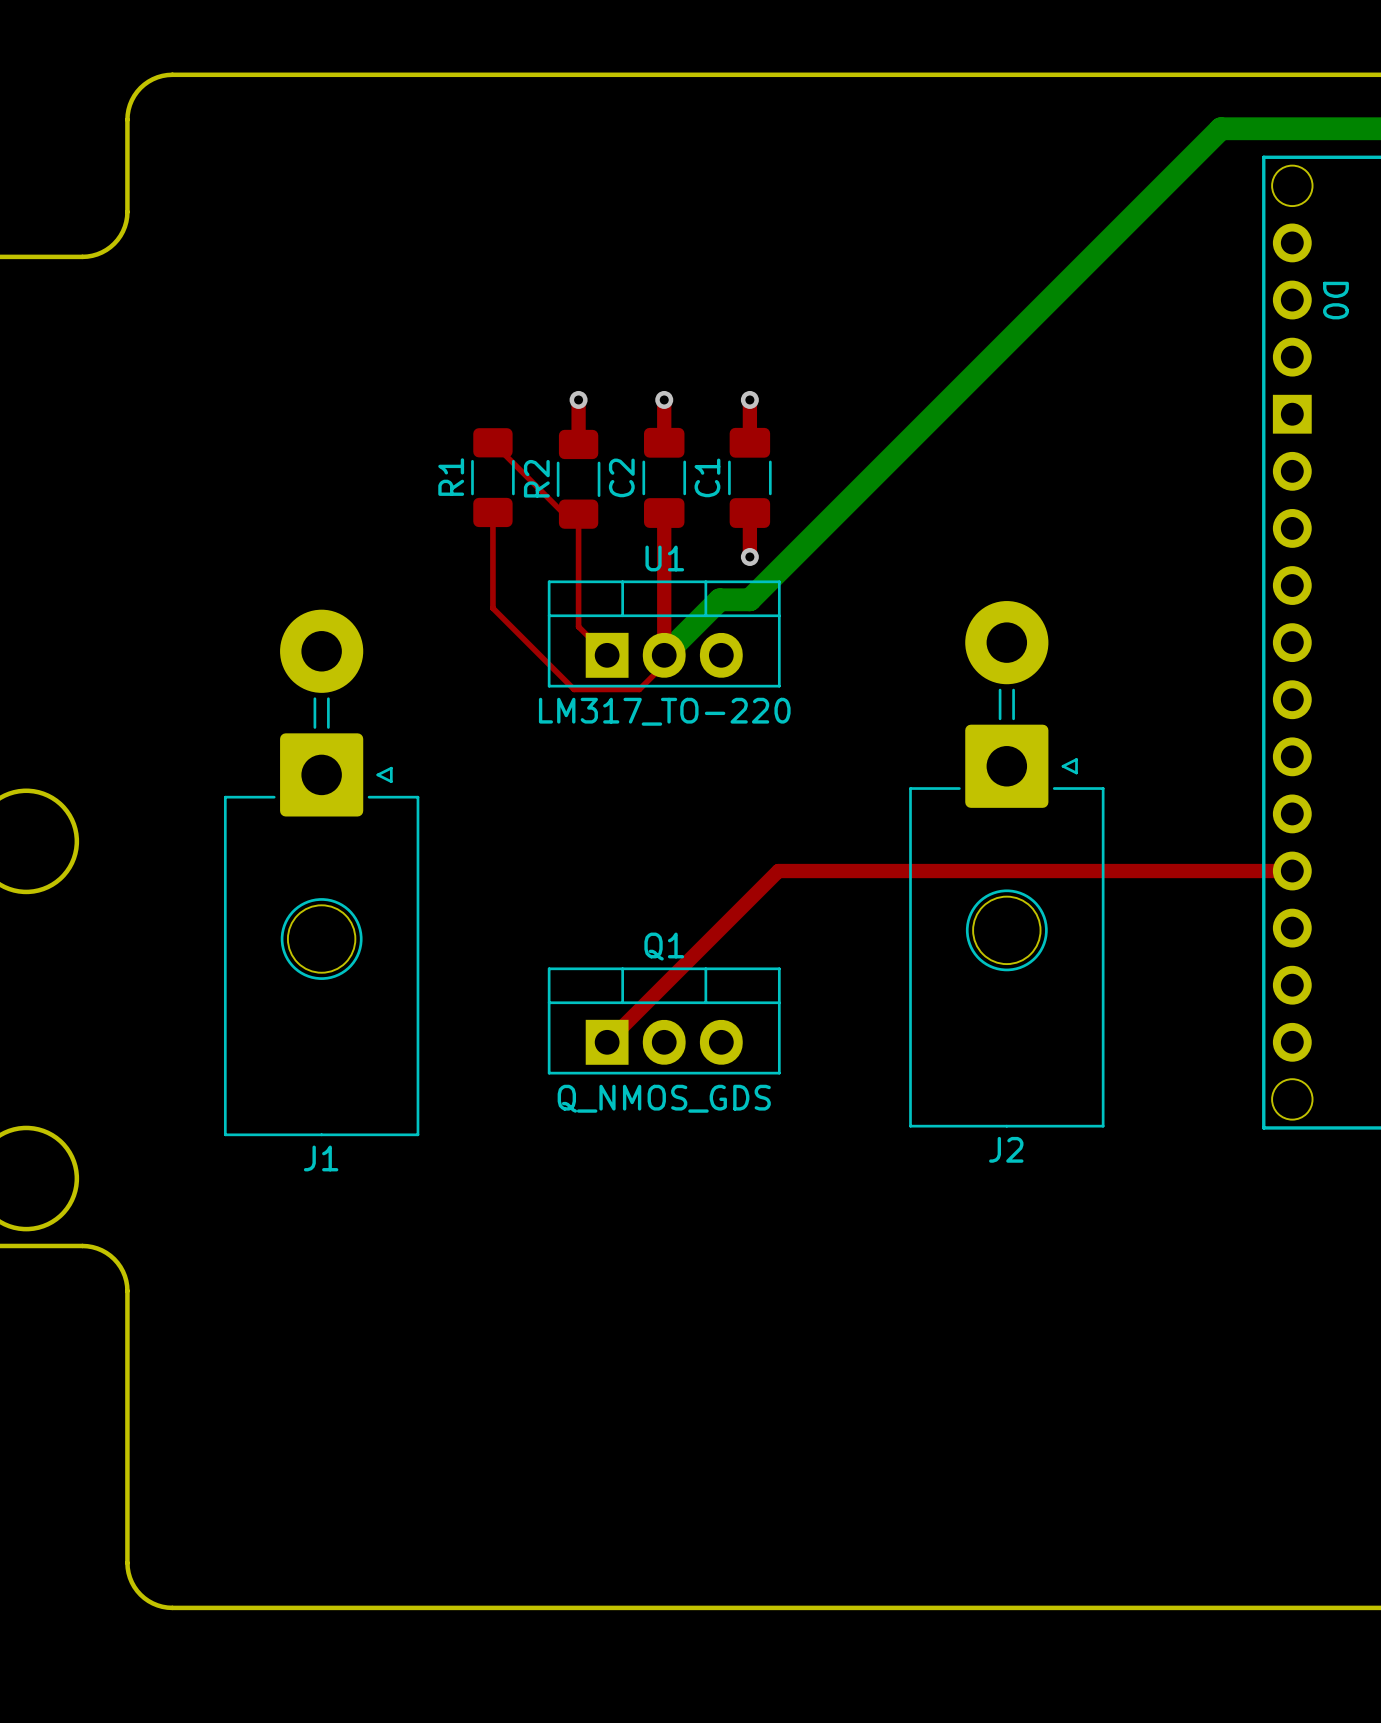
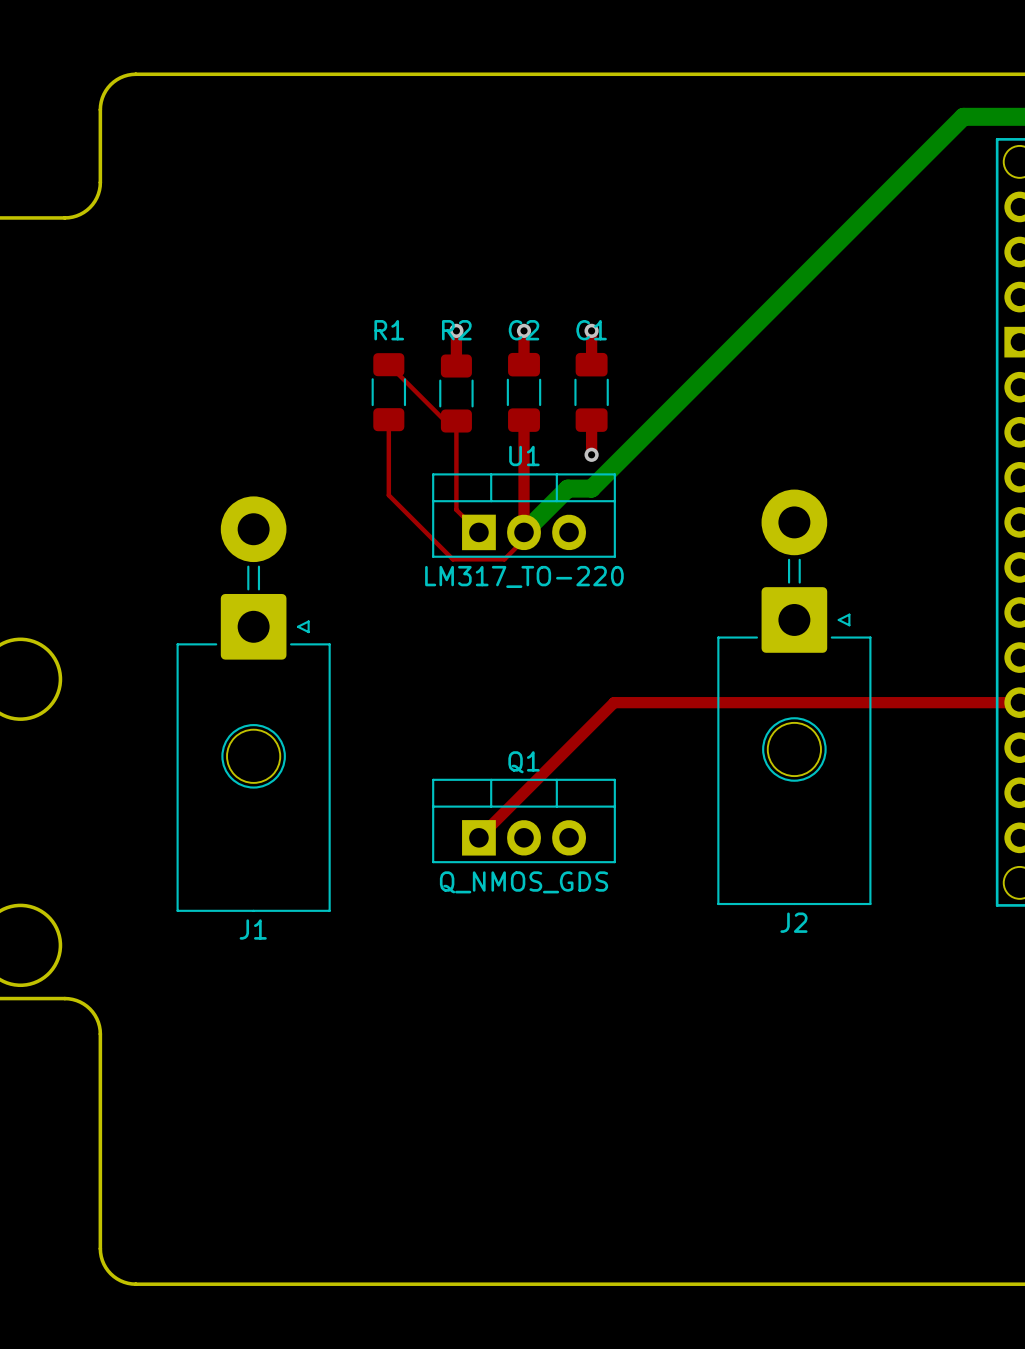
R1 name rotation: 0° (451, 477) -> 90° clockwise (389, 330)
R1 name position: R1 (451, 477) -> R1 (389, 330)
C2 name rotation: 0° (621, 477) -> 90° clockwise (524, 330)
C2 name position: C2 (621, 477) -> C2 (524, 330)
C1 name rotation: 0° (707, 477) -> 90° clockwise (591, 330)
C1 name position: C1 (707, 477) -> C1 (591, 330)
R2 name rotation: 0° (536, 478) -> 90° clockwise (456, 330)
R2 name position: R2 (536, 478) -> R2 (456, 330)

